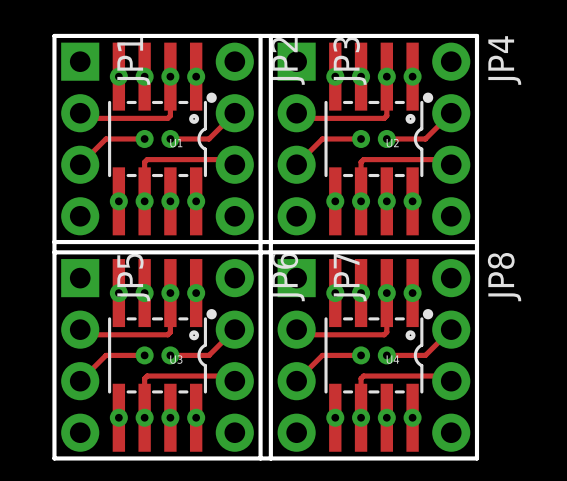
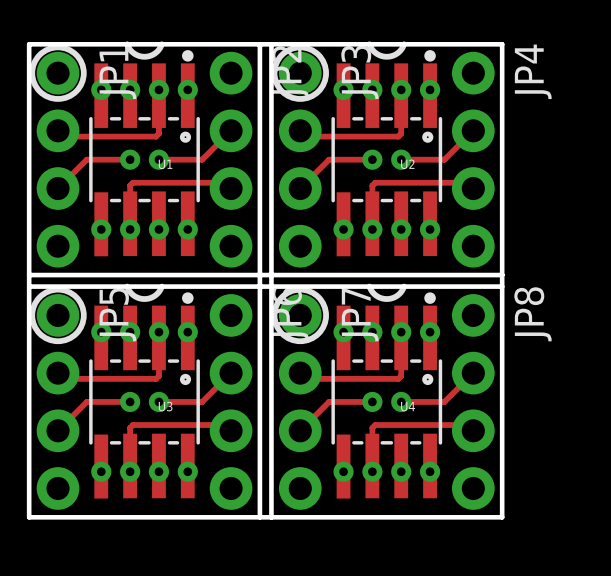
line: none -> (127, 44) (133, 53) (144, 56) (155, 53) (161, 44)
line: none -> (369, 44) (376, 53) (386, 56) (397, 53) (404, 44)
drawing: none -> [29, 44, 87, 102]
drawing: none -> [271, 44, 329, 102]
JP1 footprint: [61, 42, 100, 236] -> [36, 51, 80, 268]
U1 footprint: [108, 42, 207, 236] -> [89, 63, 200, 257]
JP3 footprint: [277, 42, 316, 236] -> [278, 51, 322, 268]
U2 footprint: [324, 42, 424, 236] -> [331, 63, 443, 257]
drawing position: (211, 97) -> (187, 55)
drawing position: (428, 97) -> (430, 55)
drawing: none -> [29, 286, 87, 345]
line: none -> (127, 286) (133, 295) (144, 299) (155, 295) (161, 286)
drawing: none -> [271, 286, 329, 345]
line: none -> (369, 286) (376, 295) (386, 299) (397, 295) (404, 286)
JP5 footprint: [61, 259, 100, 452] -> [36, 294, 80, 510]
U3 footprint: [108, 259, 207, 452] -> [89, 305, 200, 499]
JP7 footprint: [277, 259, 316, 452] -> [278, 294, 322, 510]
U4 footprint: [324, 259, 424, 452] -> [331, 305, 443, 499]
drawing position: (211, 314) -> (187, 298)
drawing position: (428, 314) -> (430, 298)

